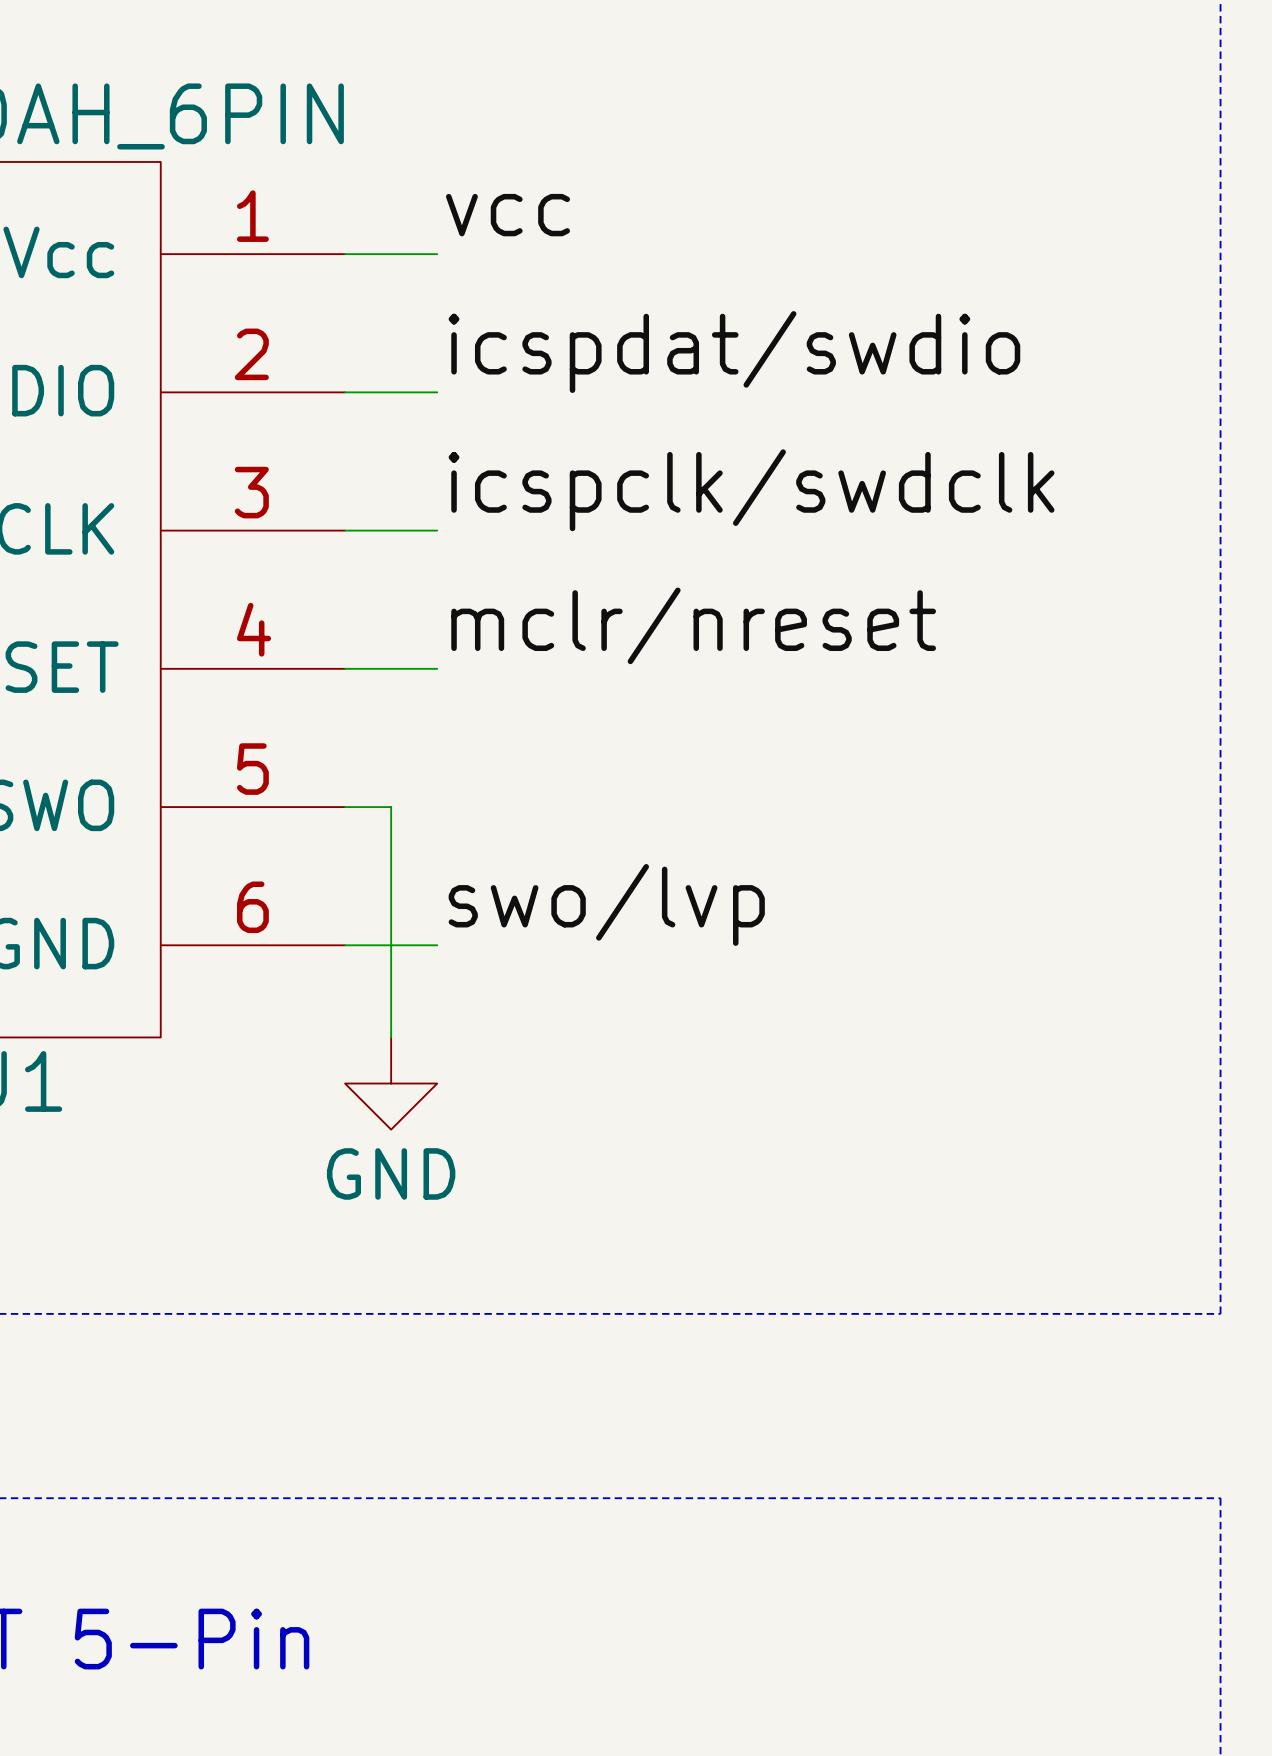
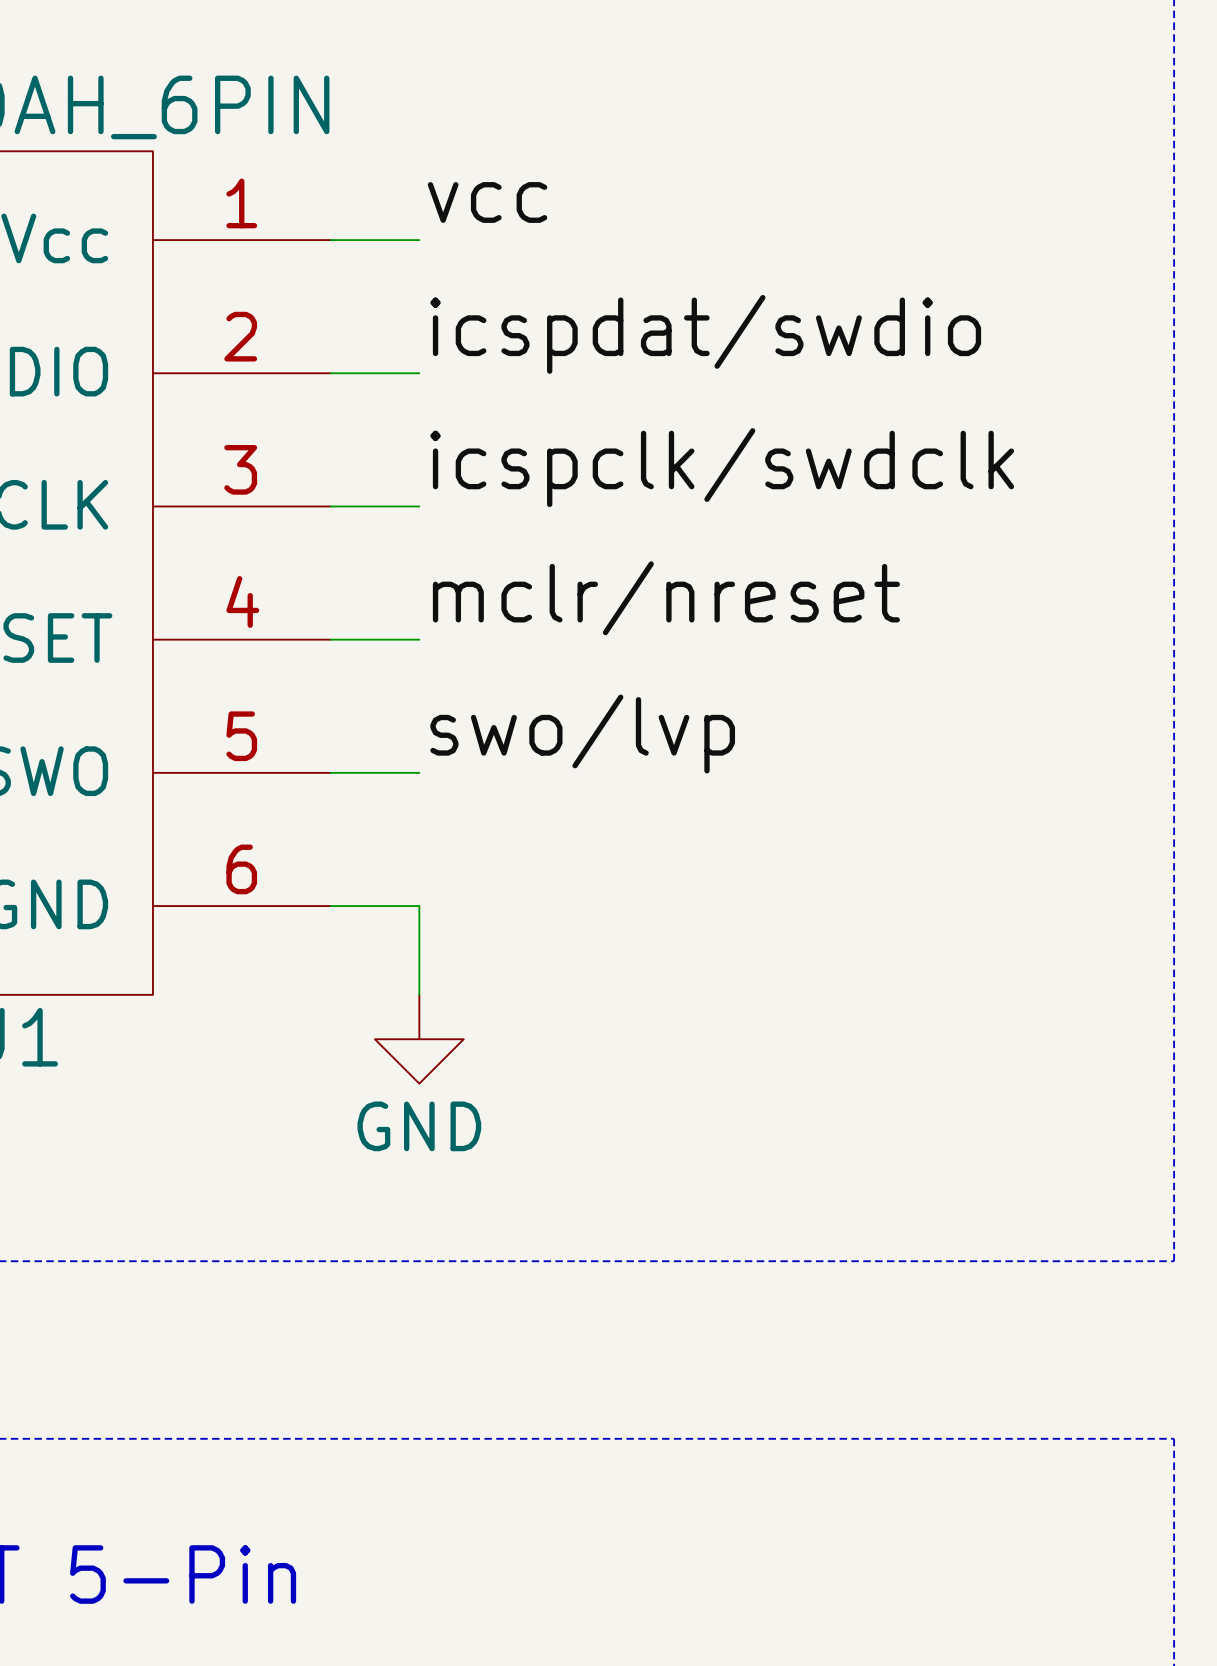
wire: (391, 807) (391, 1037) -> (374, 772) (419, 772)
label position: swo/lvp (606, 904) -> swo/lvp (582, 733)
wire: none -> (419, 906) (419, 994)
power symbol position: GND (391, 1083) -> GND (419, 1039)

